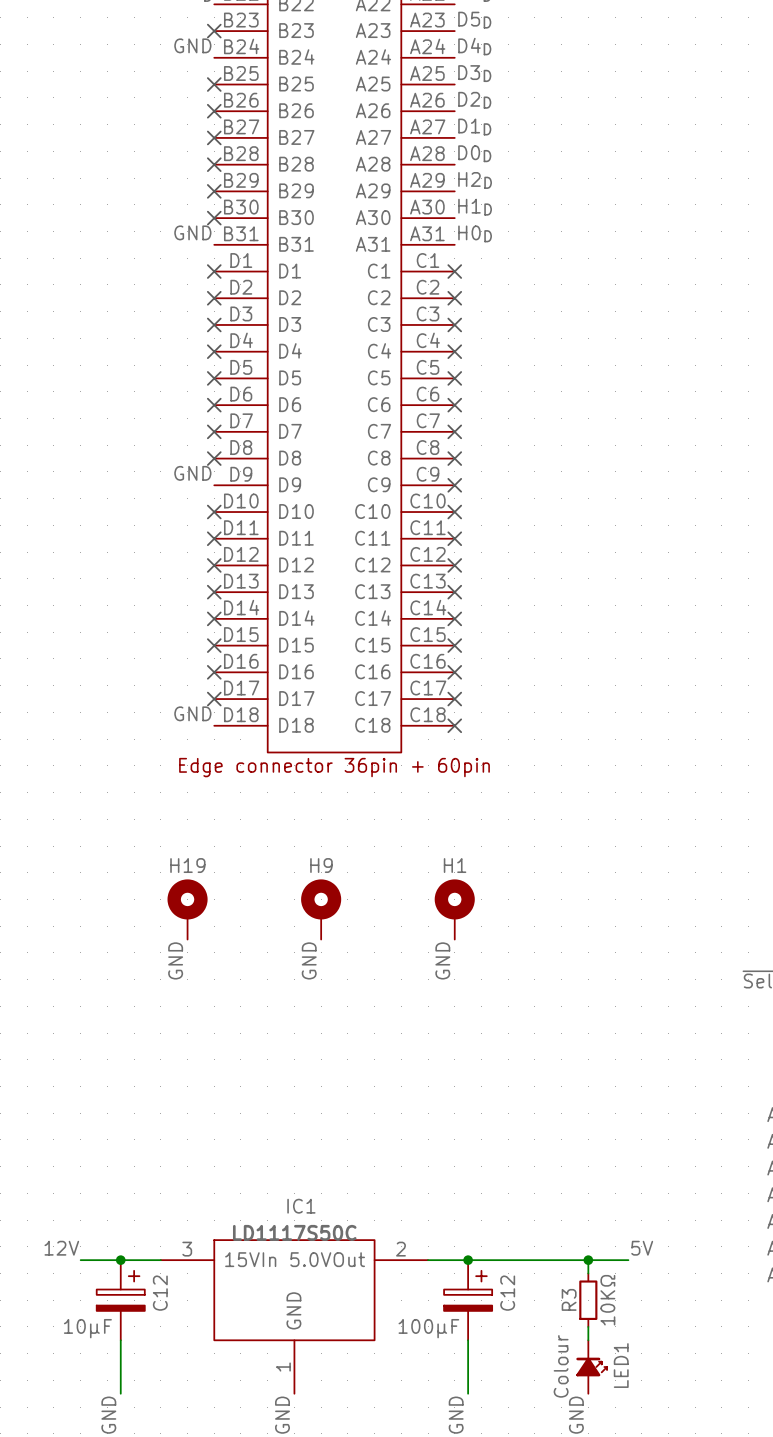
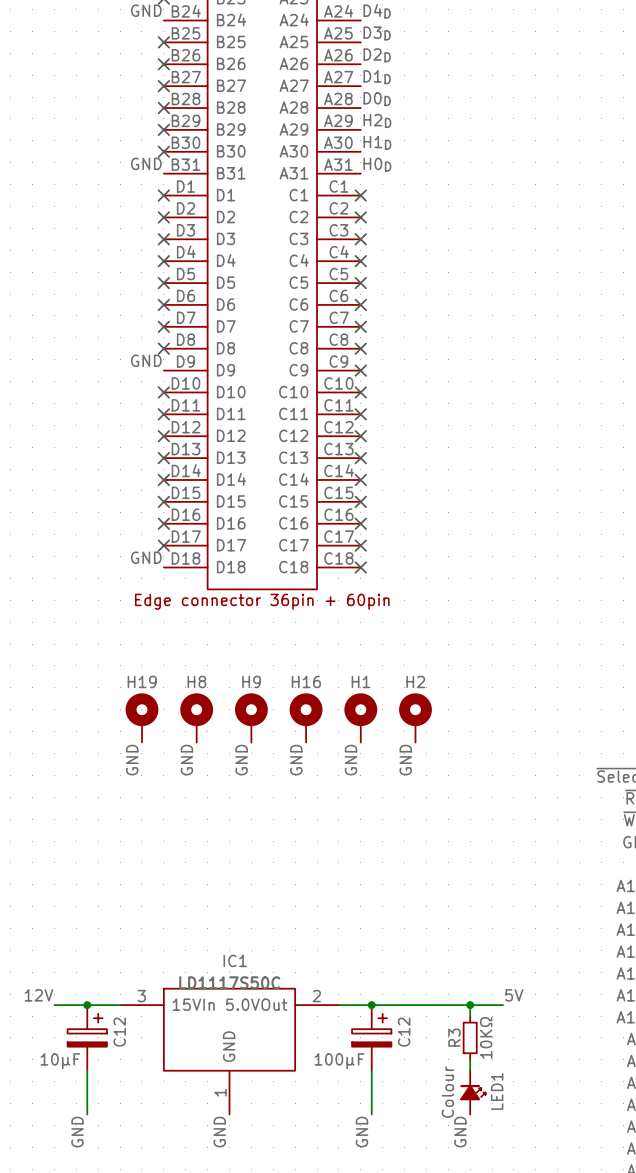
H8: none -> (196, 717)
H16: none -> (306, 717)
H2: none -> (415, 717)
label: none -> GND (186, 760)
label: none -> GND (296, 760)
label: none -> GND (405, 760)

